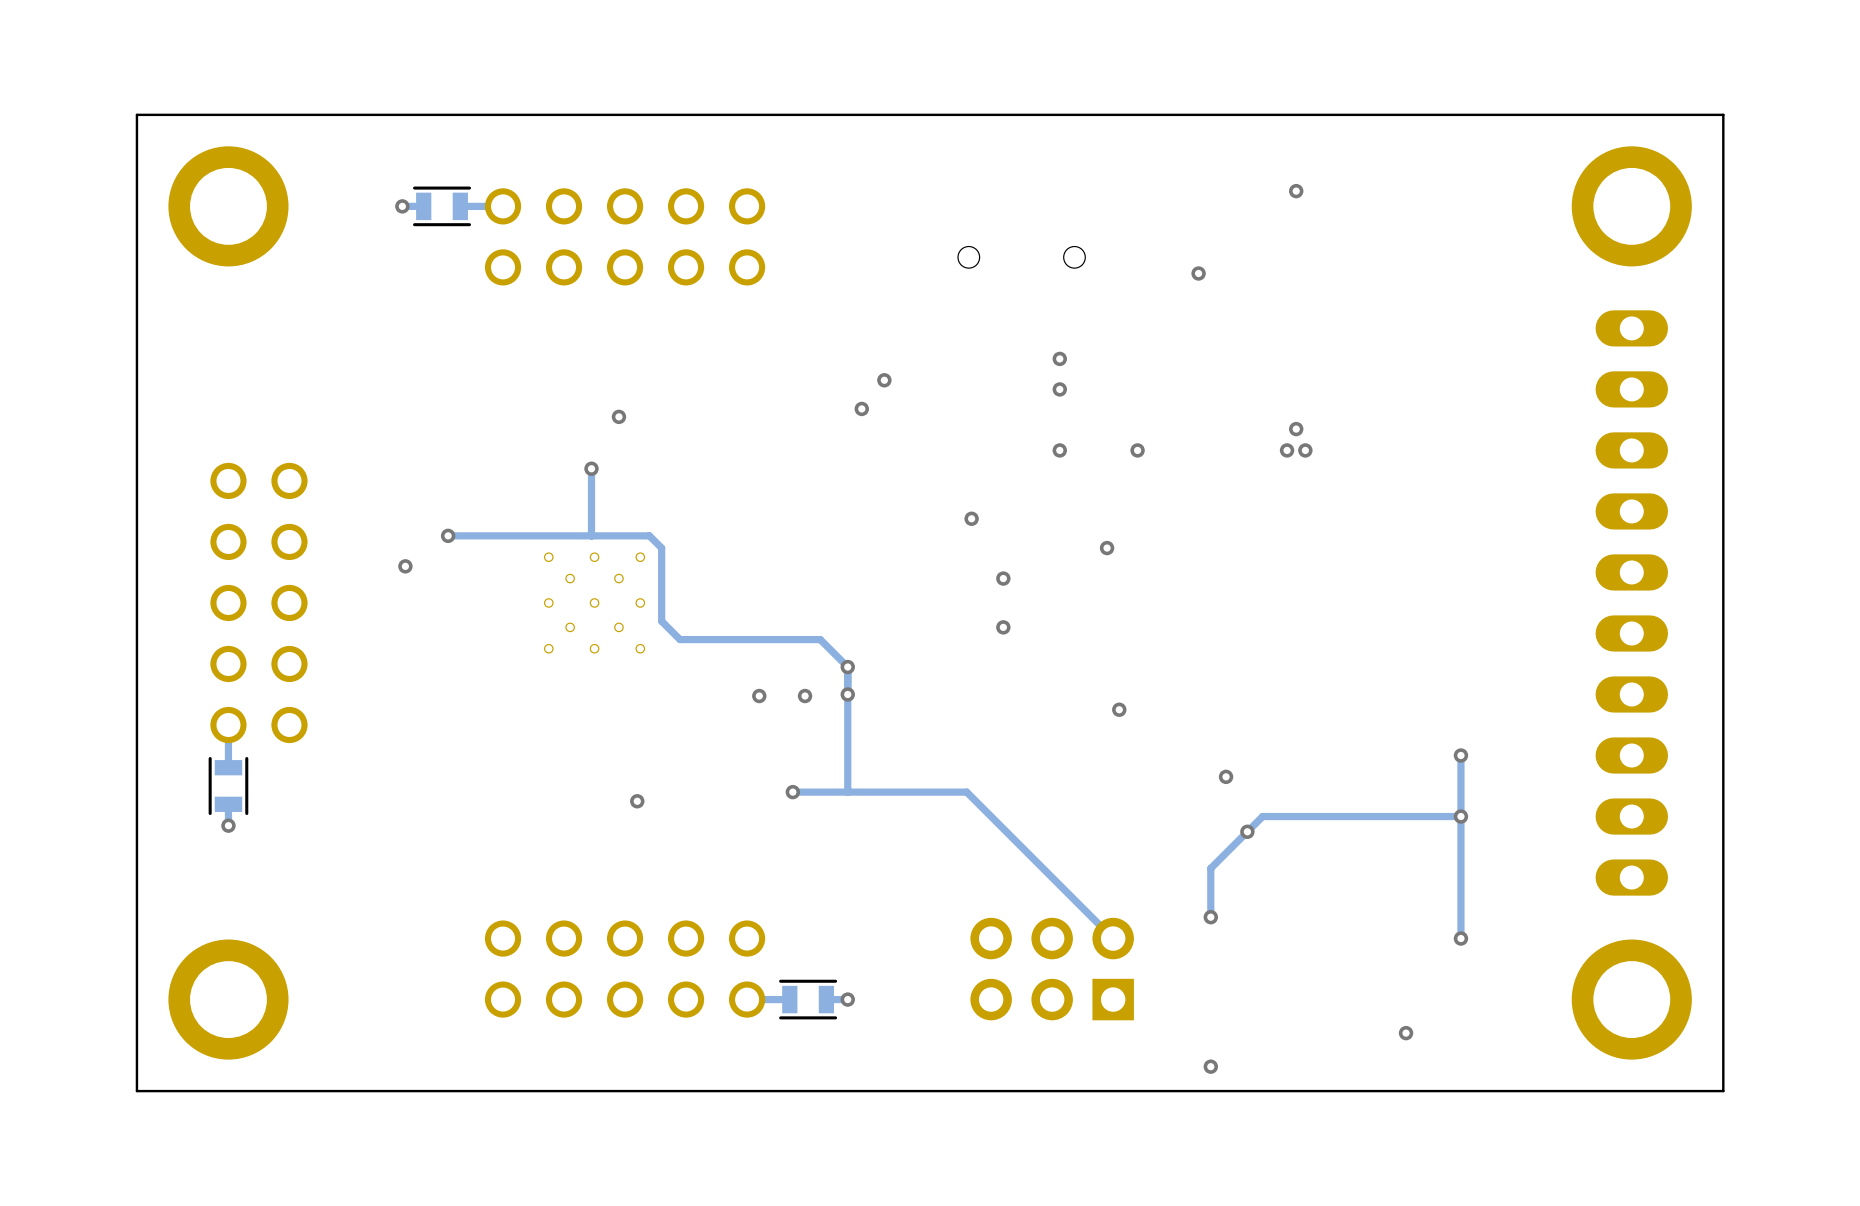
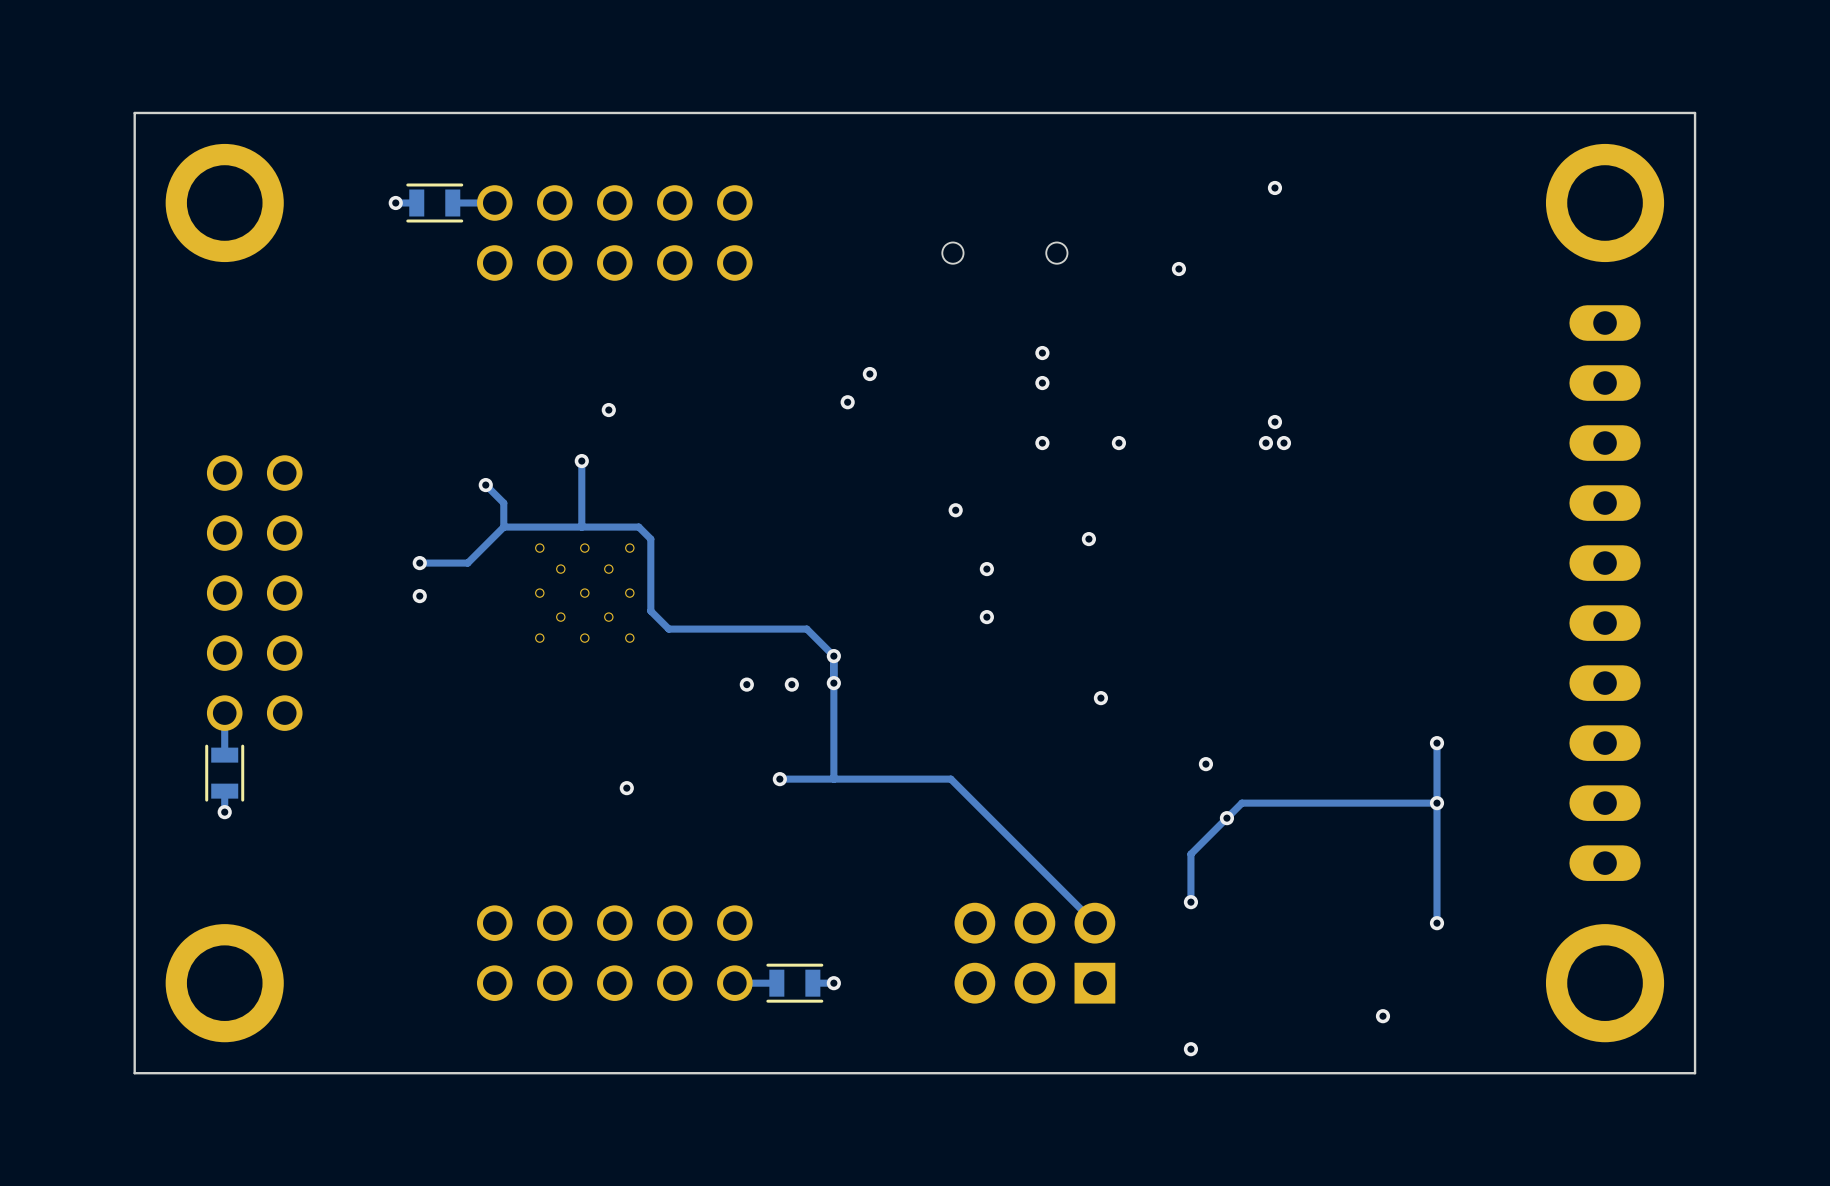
track: none -> (485, 485) (503, 503) (503, 527) (467, 563) (419, 563)
via: none -> (485, 485)
via: (448, 535) -> none
track: (512, 535) (448, 535) -> none
via: (405, 566) -> none
via: none -> (419, 563)
via: none -> (419, 596)

